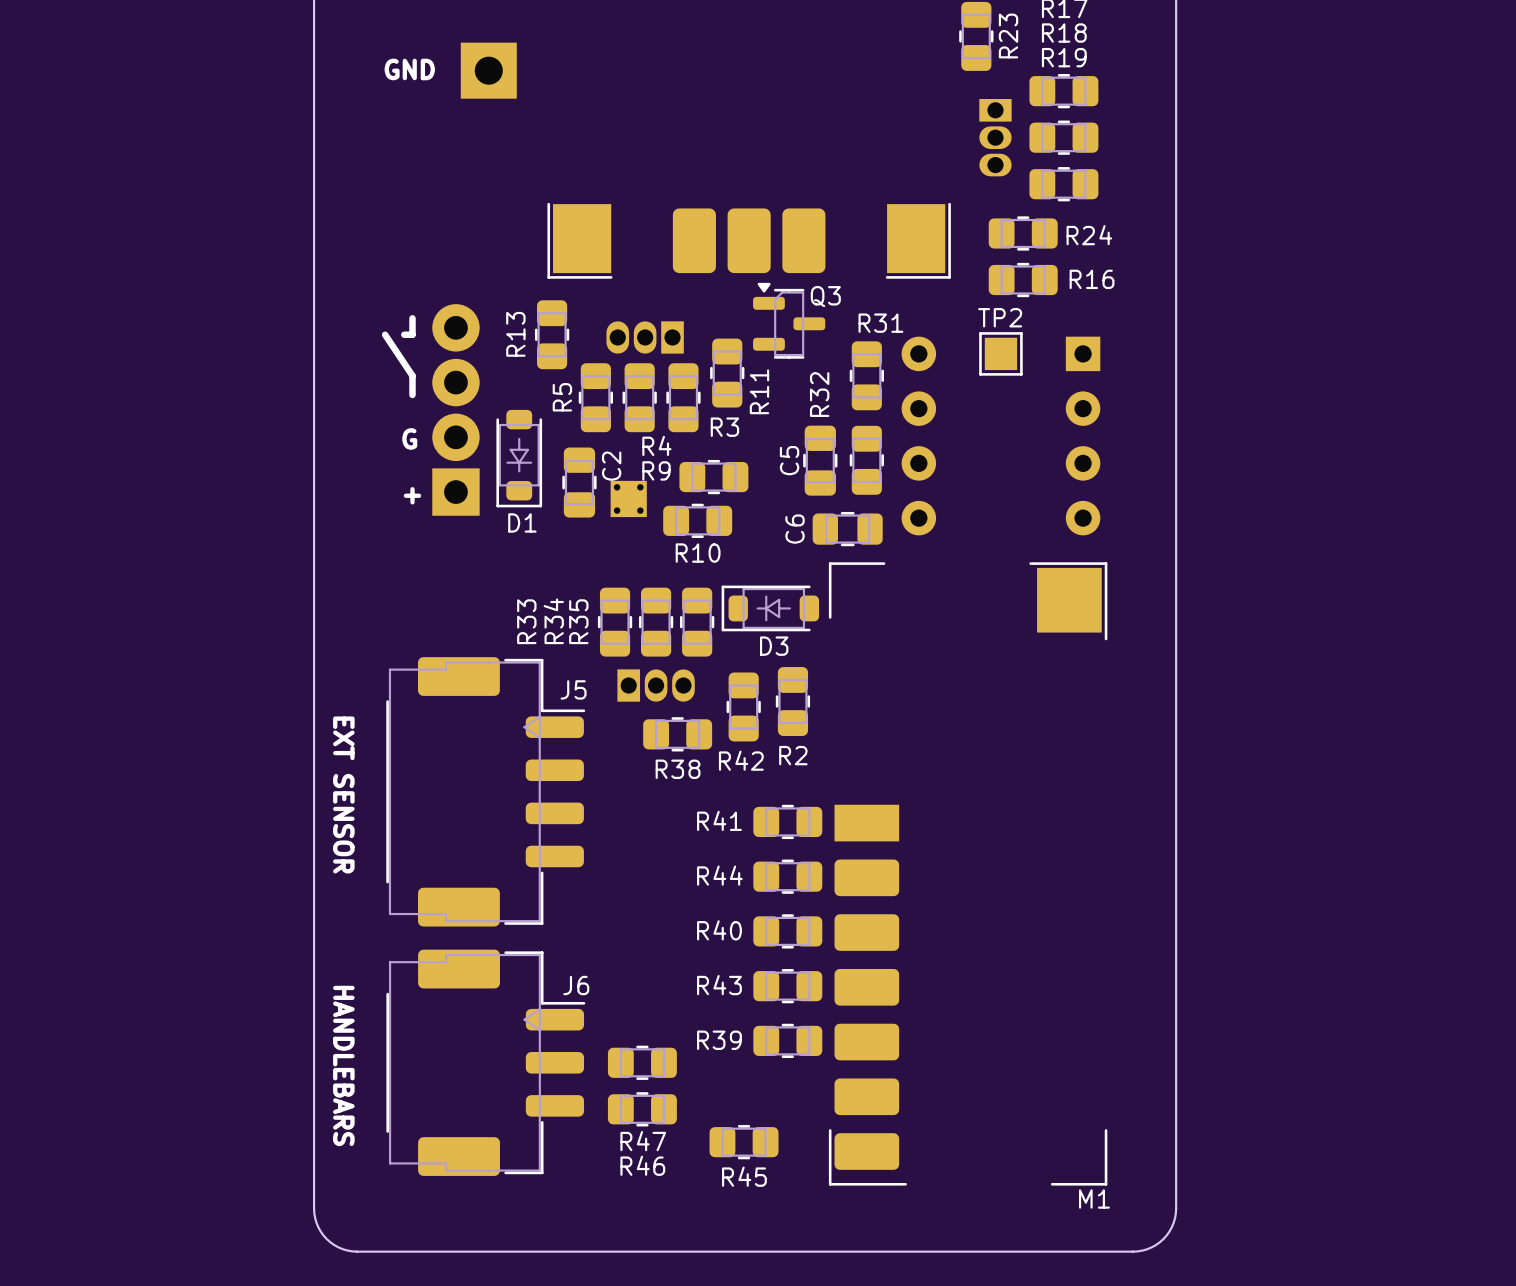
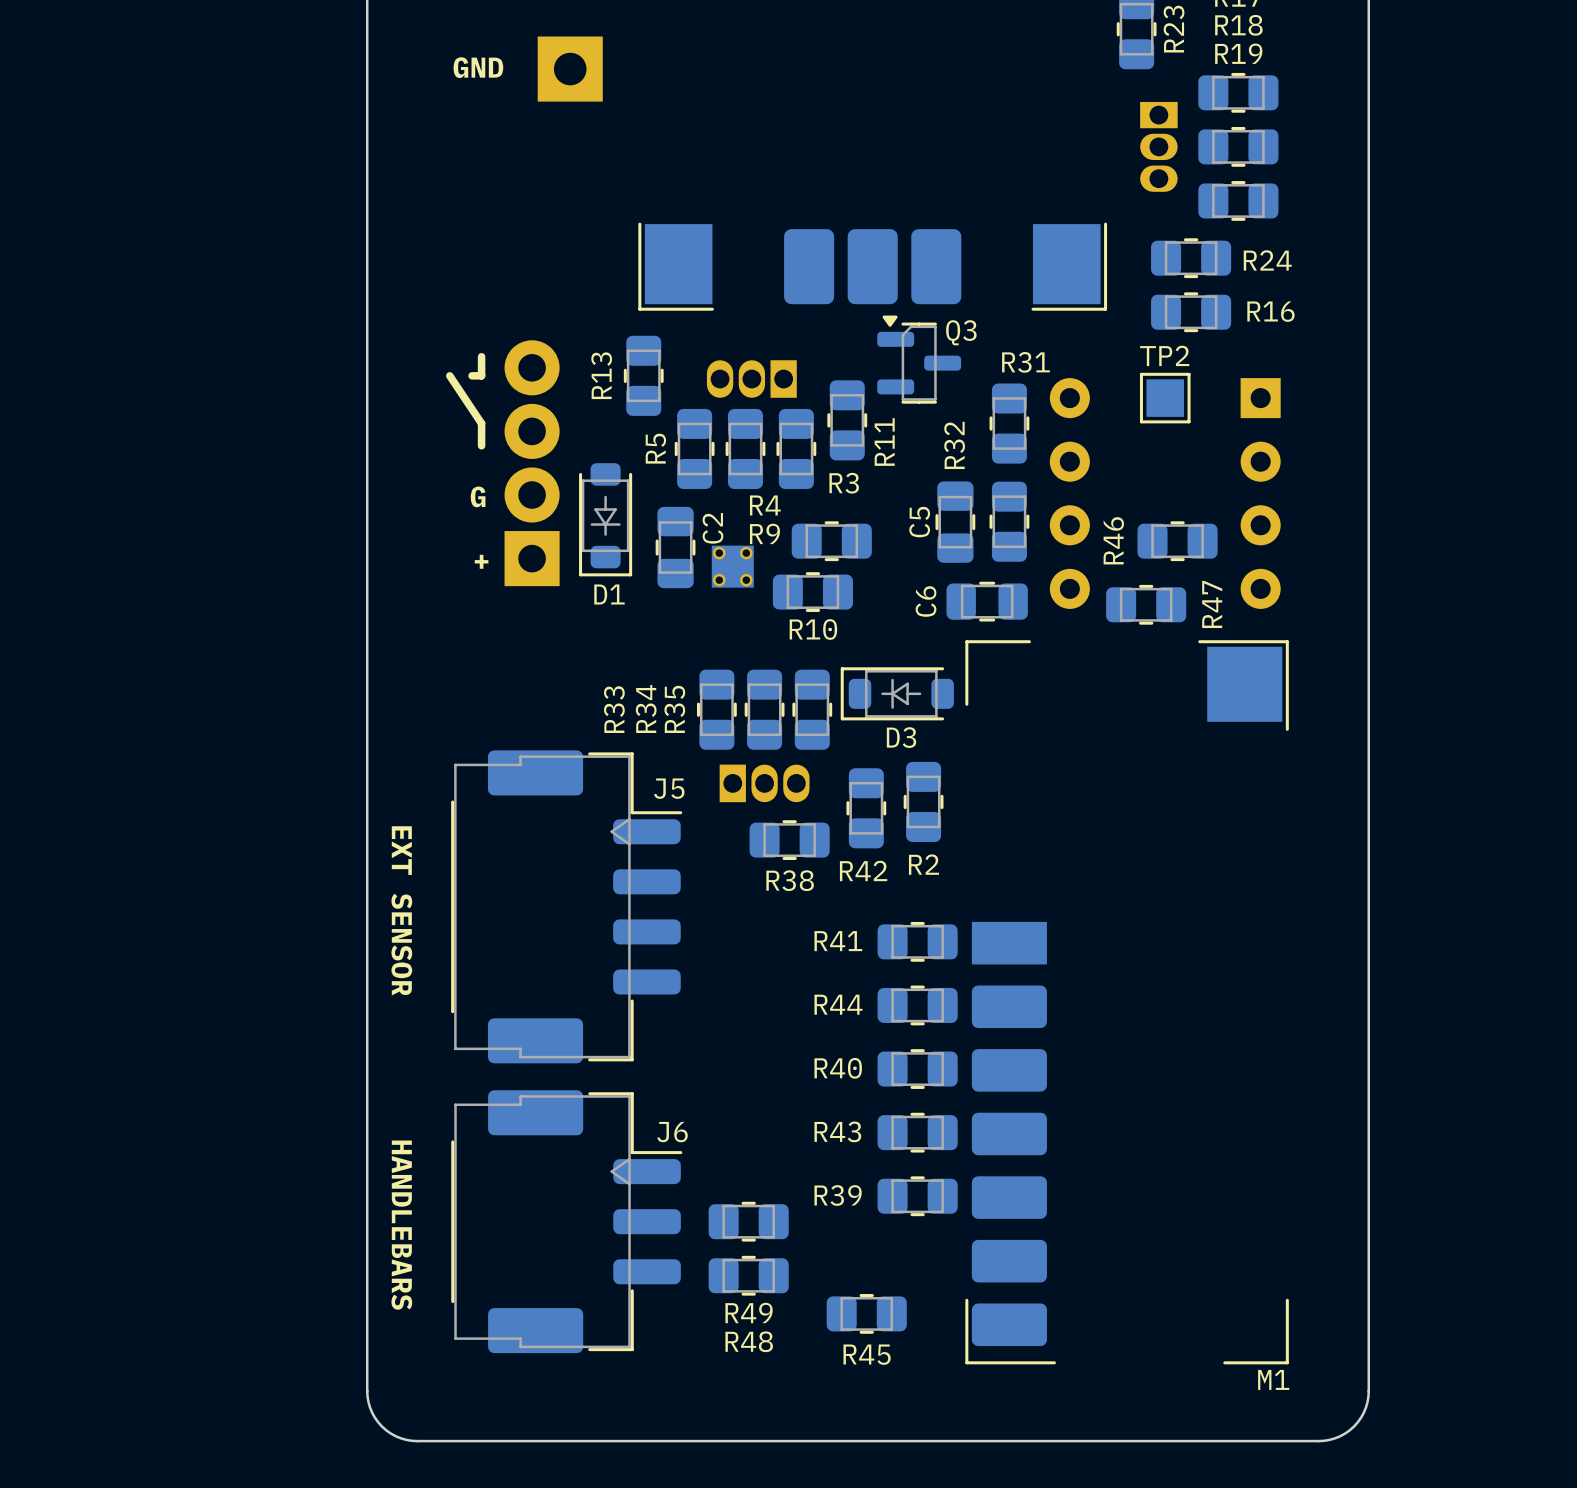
R46: none -> (1177, 541)
R47: none -> (1146, 604)
R47 name: R47 (643, 1141) -> R49 (749, 1312)
R46 name: R46 (642, 1165) -> R48 (749, 1341)

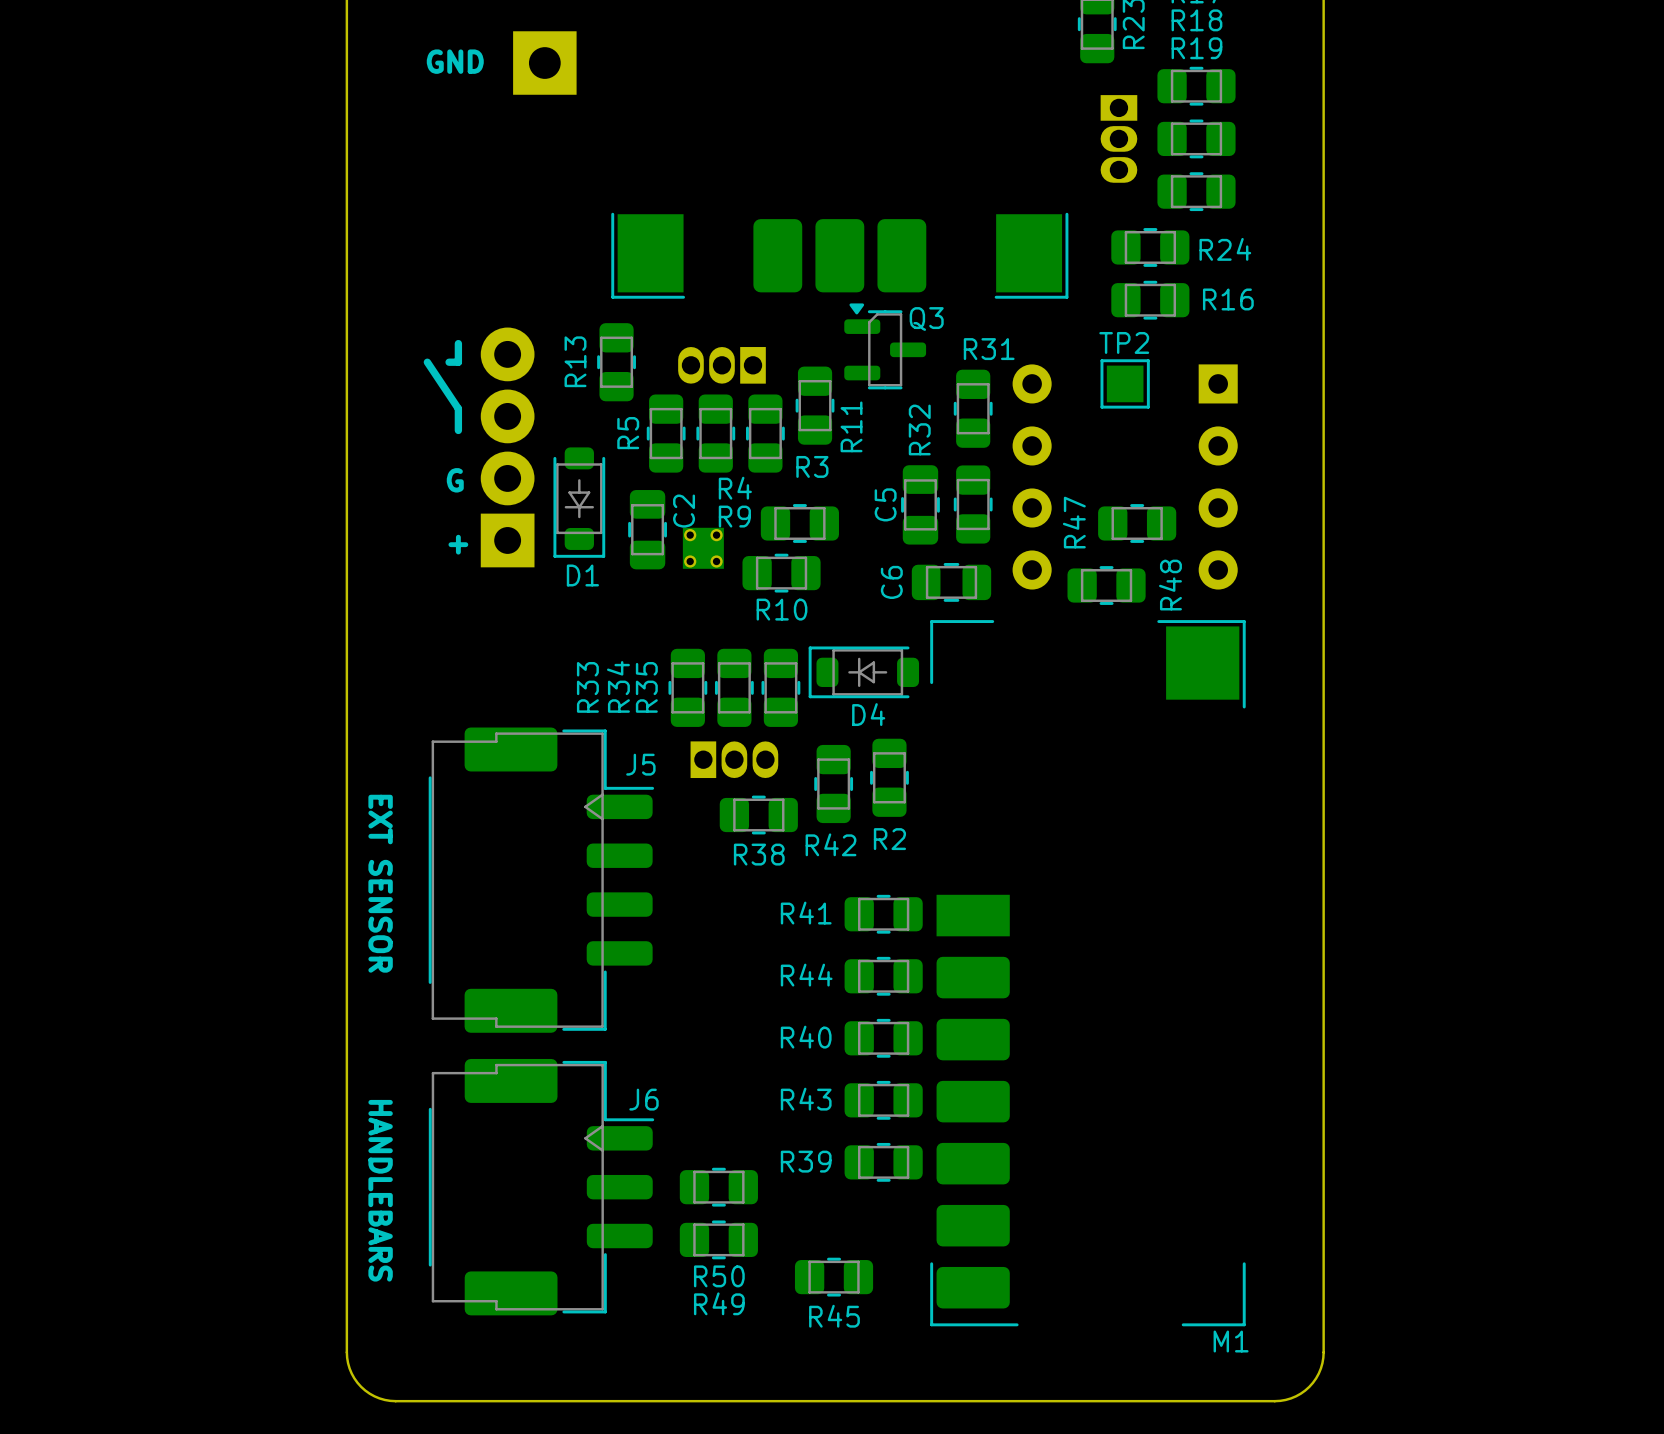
R46 name: R46 (1113, 540) -> R47 (1074, 522)
R47 name: R47 (1212, 604) -> R48 (1170, 585)
D3 name: D3 (901, 737) -> D4 (868, 714)
R49 name: R49 (749, 1312) -> R50 (719, 1276)
R48 name: R48 (749, 1341) -> R49 (719, 1303)

